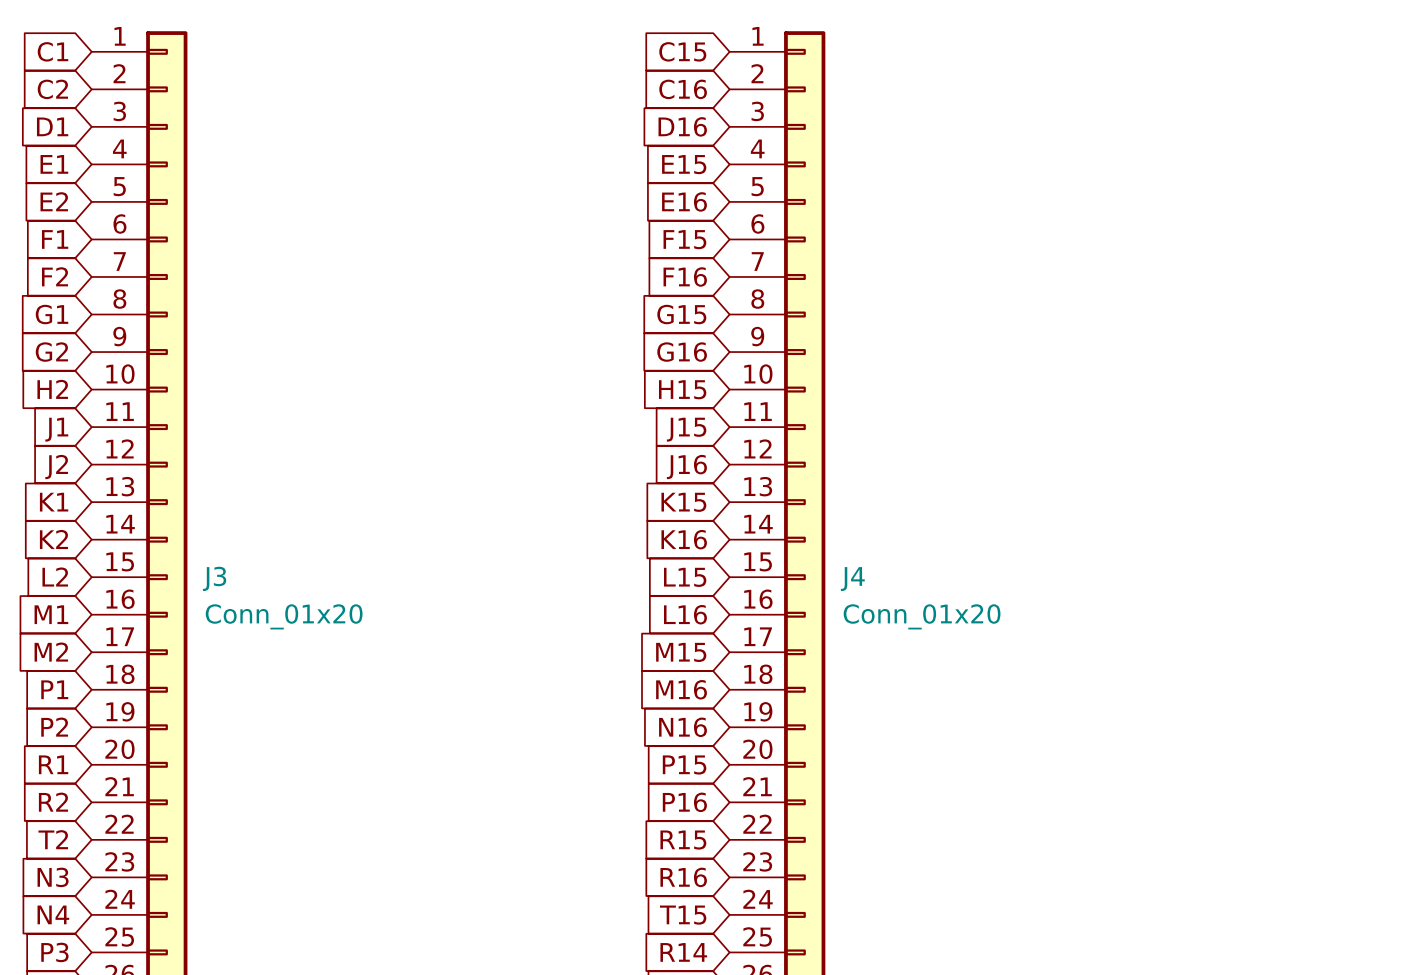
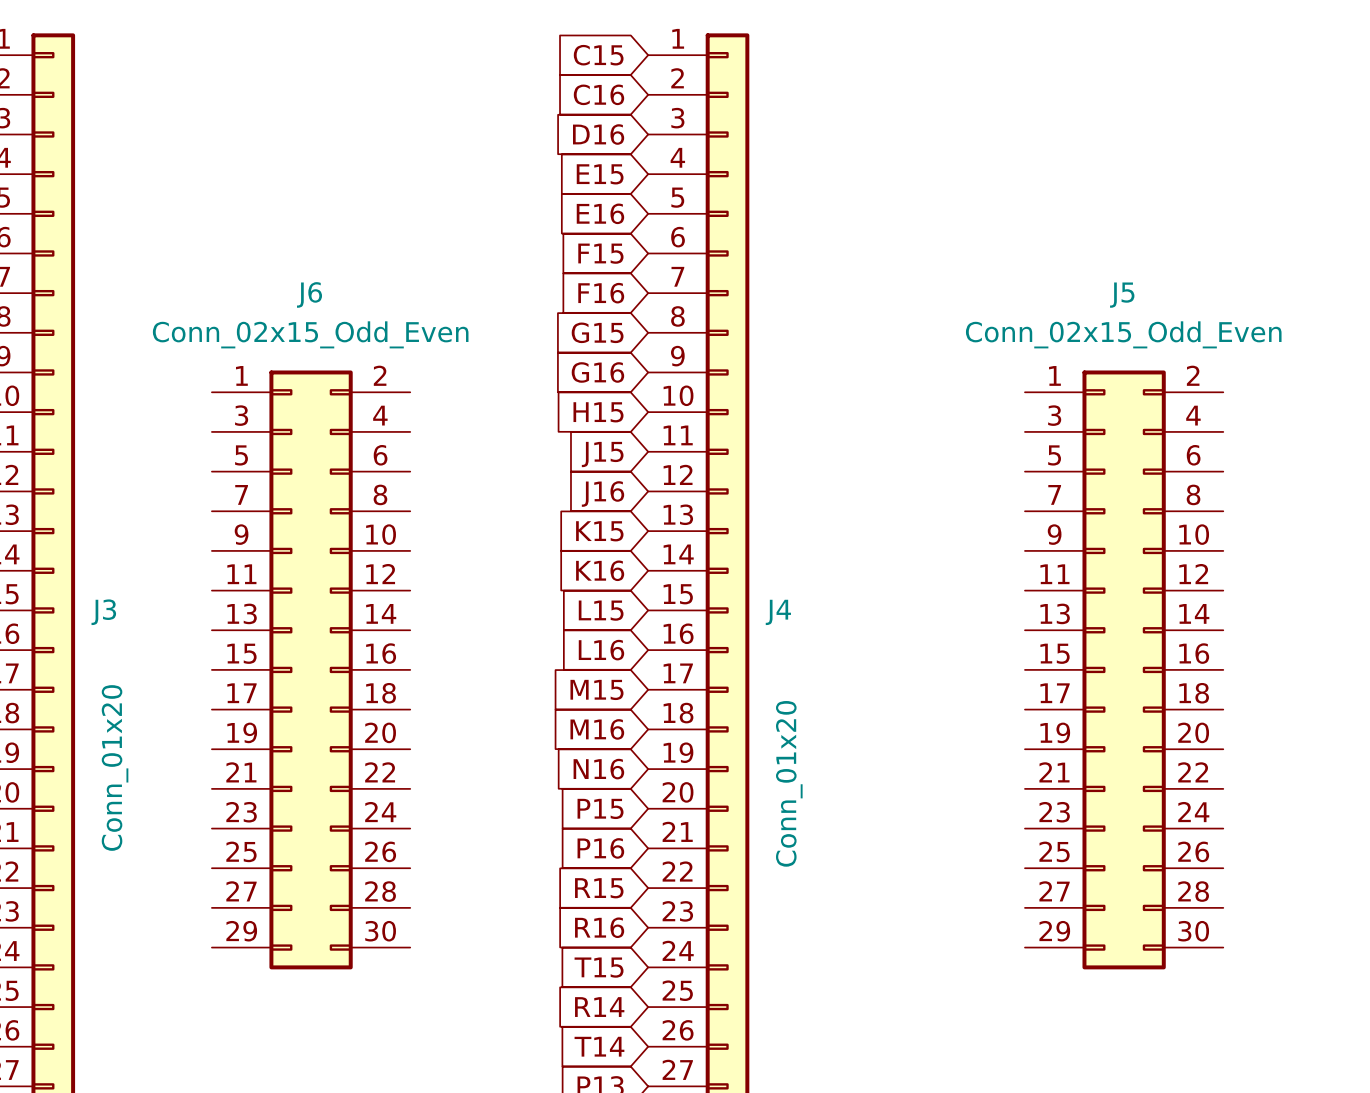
J3 value rotation: 0° (284, 616) -> 90° counterclockwise (115, 767)
J4 value rotation: 0° (922, 616) -> 90° counterclockwise (789, 783)
J6: none -> Conn_02x15_Odd_Even (311, 669)
J5: none -> Conn_02x15_Odd_Even (1124, 669)

